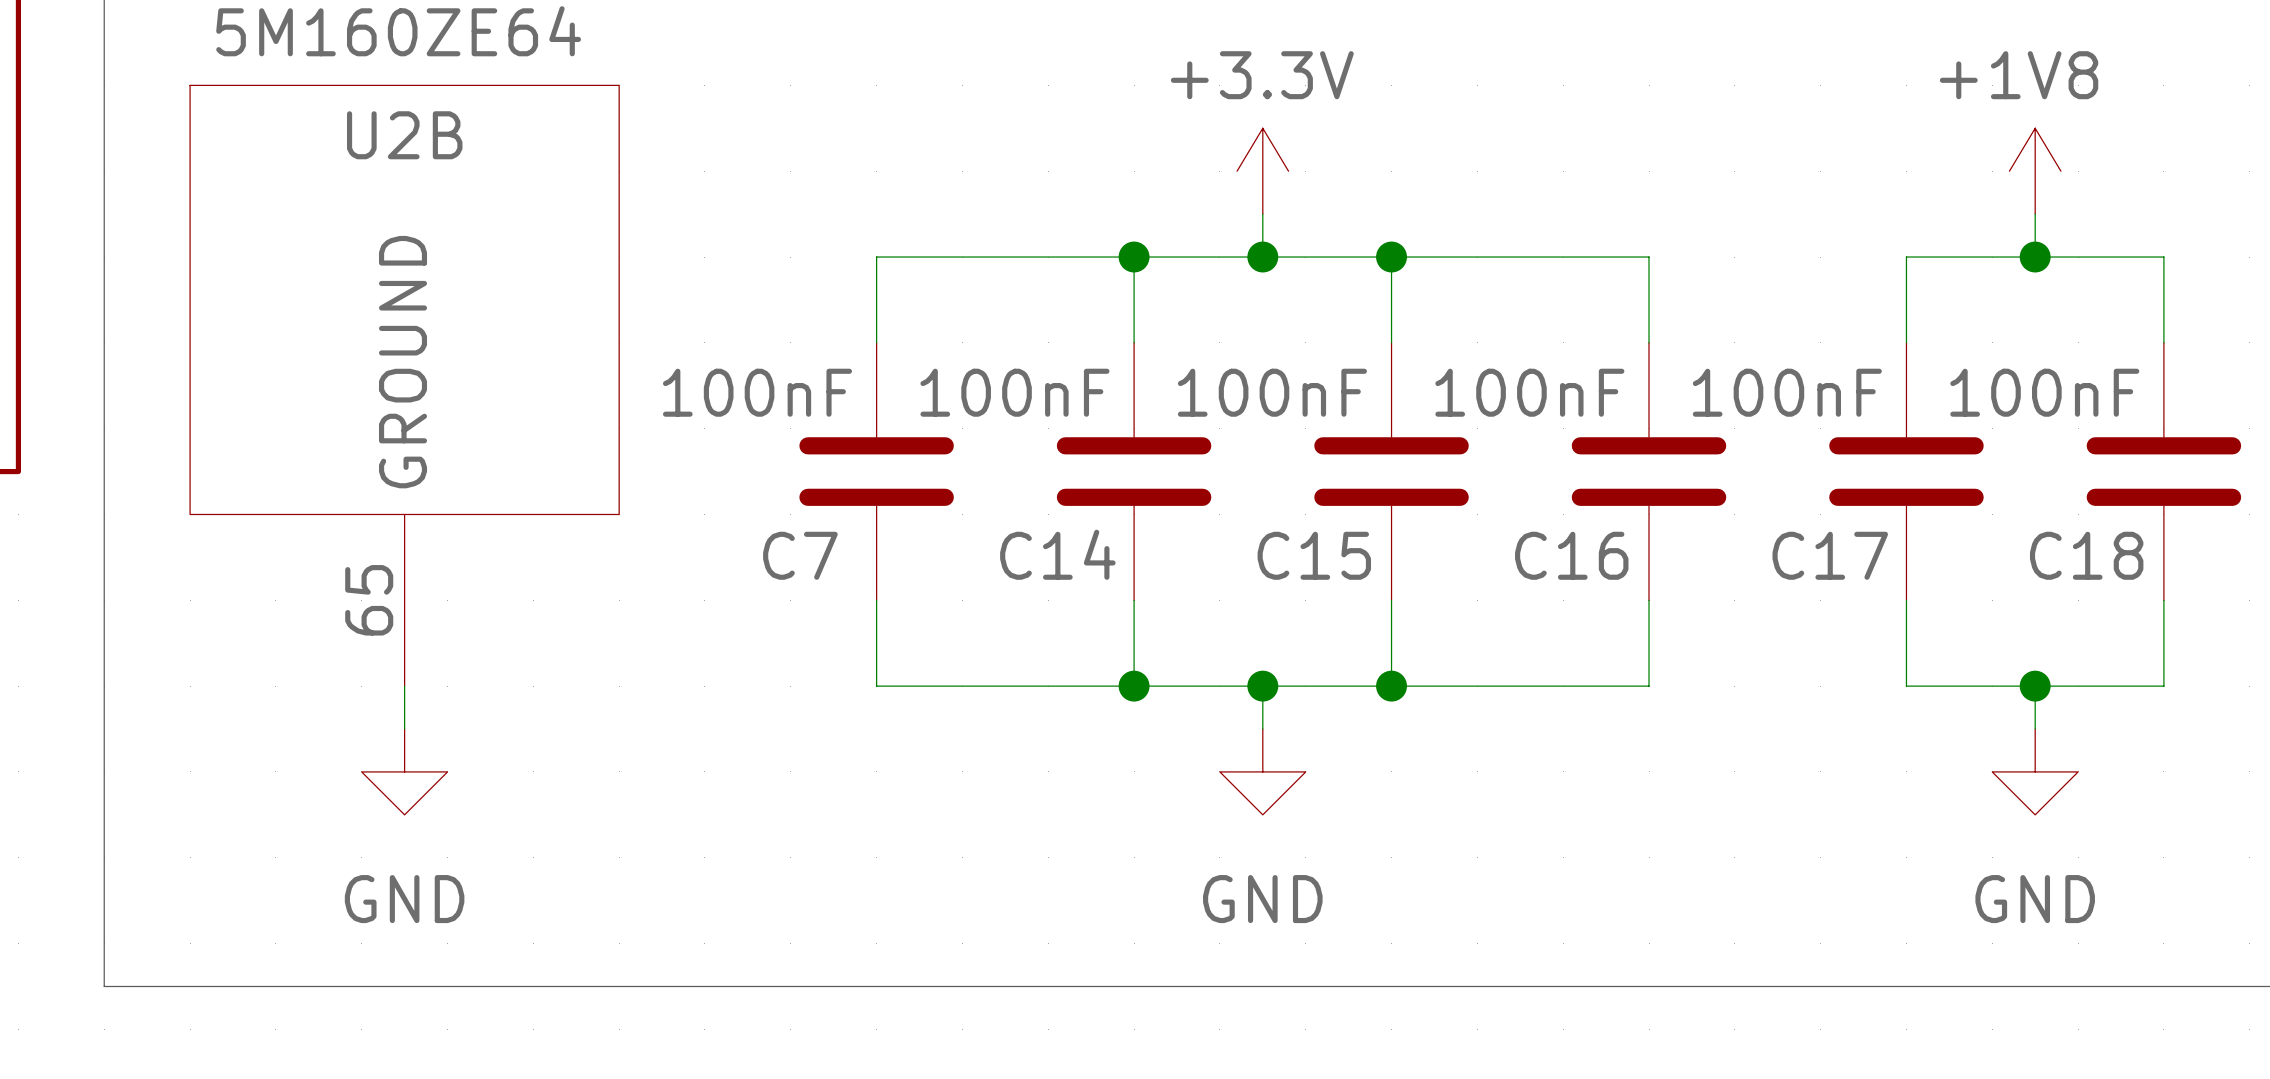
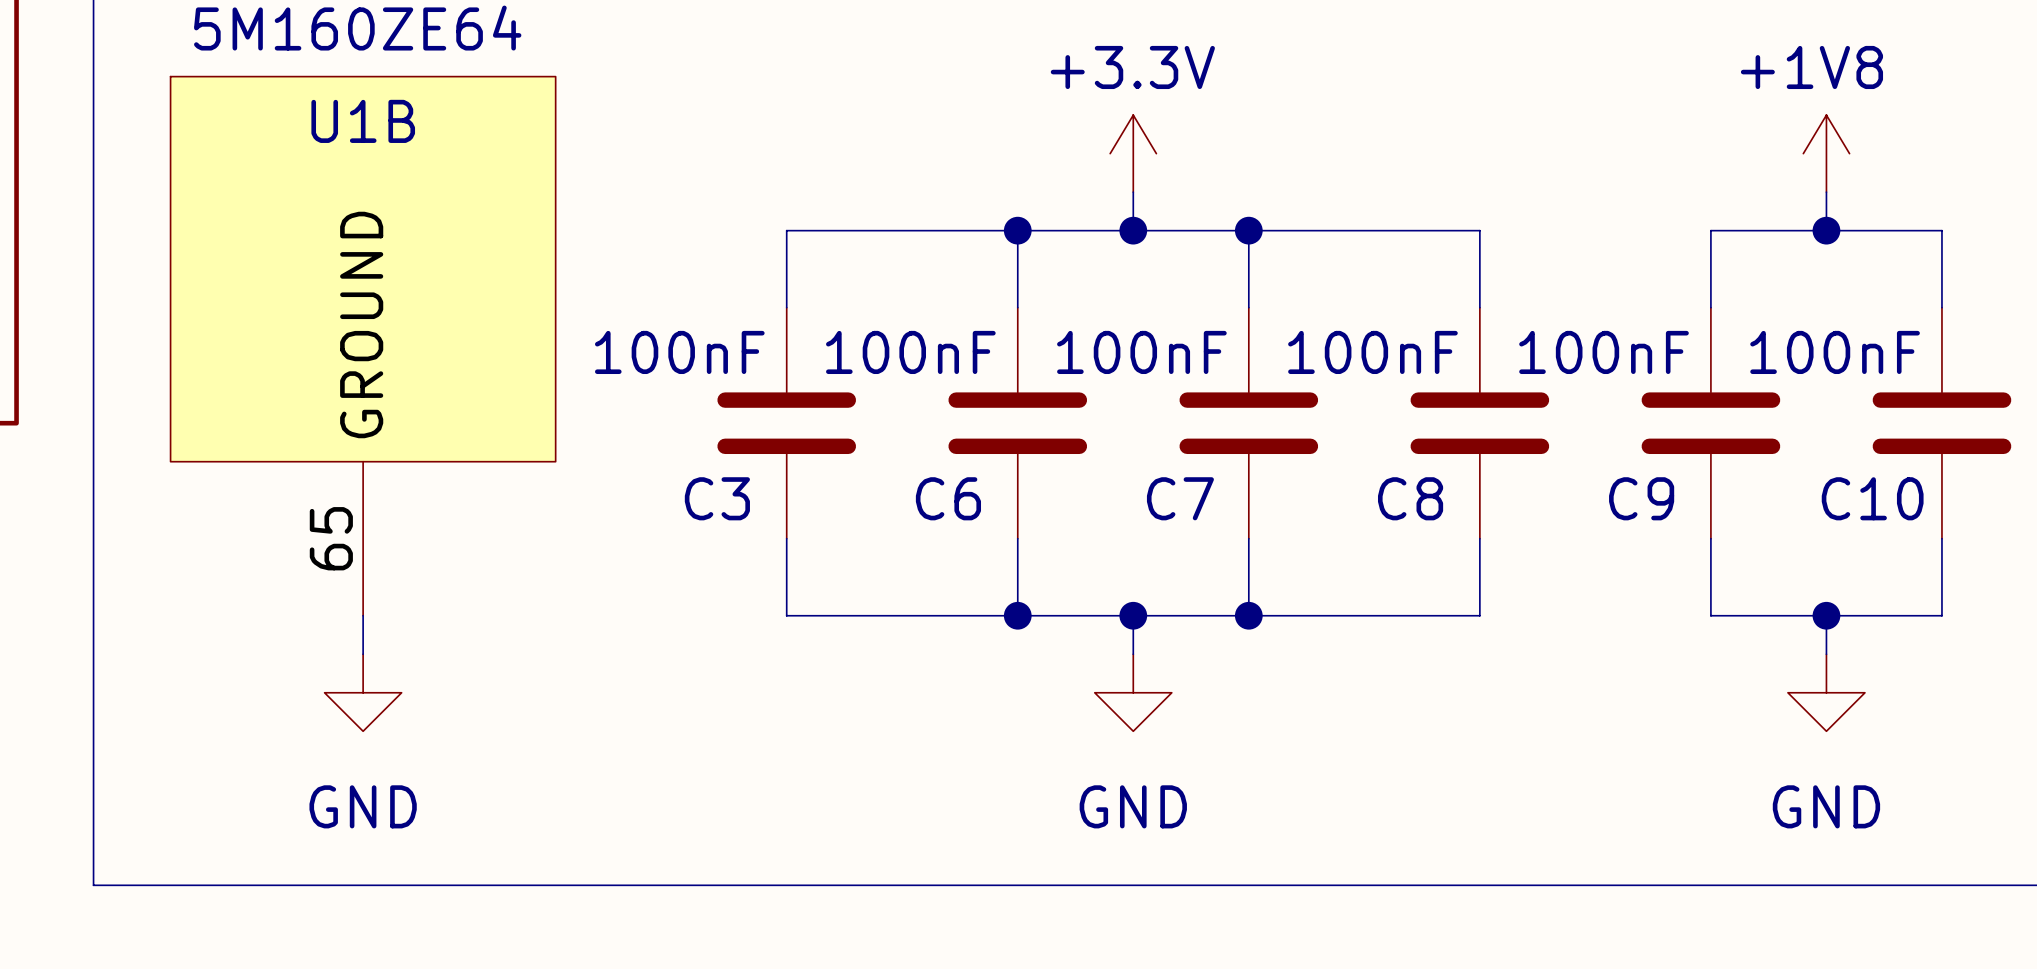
U2B name: U2B (404, 135) -> U1B (363, 121)
C14 name: C14 (1057, 554) -> C6 (948, 498)
C7 name: C7 (800, 555) -> C3 (717, 498)
C15 name: C15 (1314, 555) -> C7 (1180, 498)
C16 name: C16 (1571, 555) -> C8 (1410, 498)
C17 name: C17 (1830, 555) -> C9 (1641, 498)
C18 name: C18 (2086, 555) -> C10 (1872, 498)

